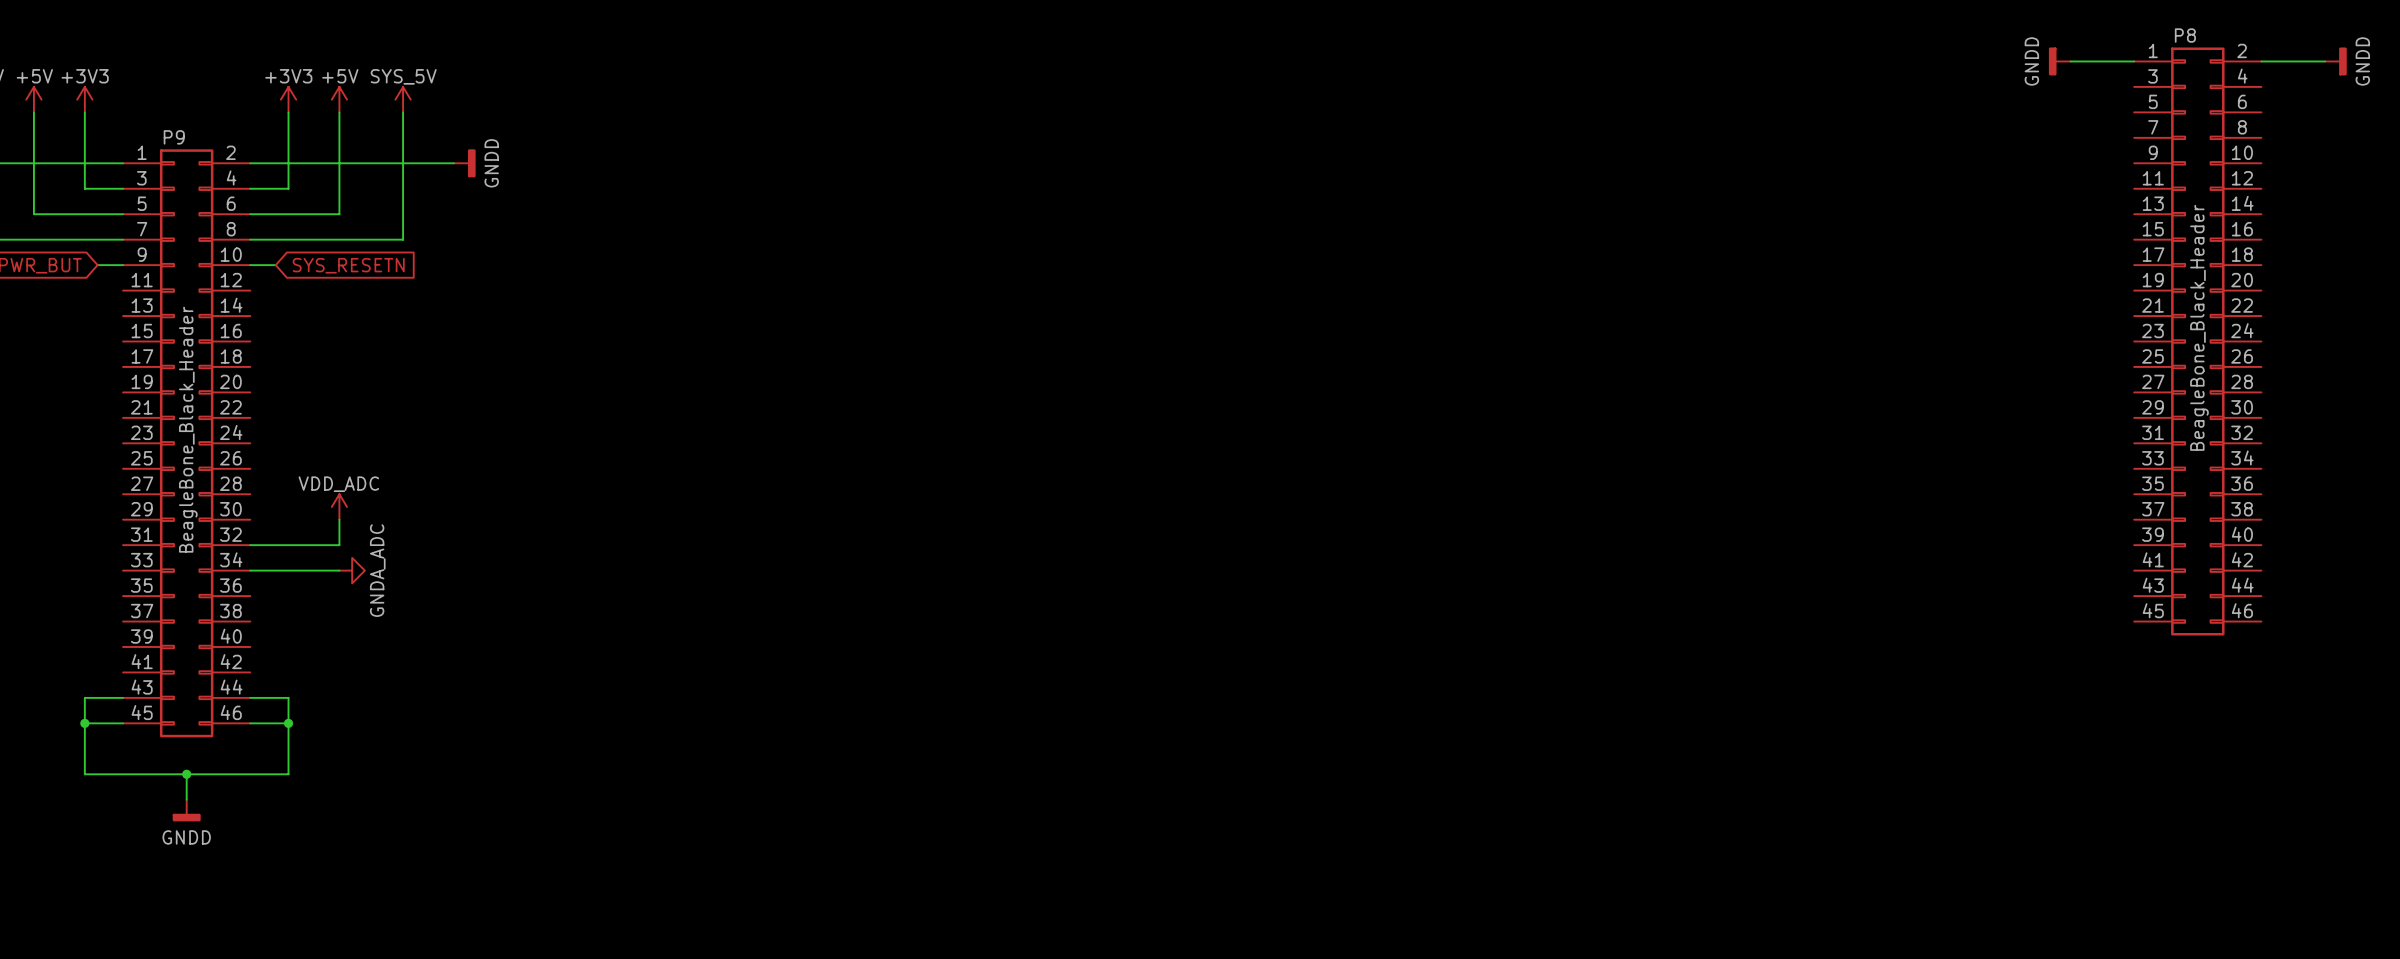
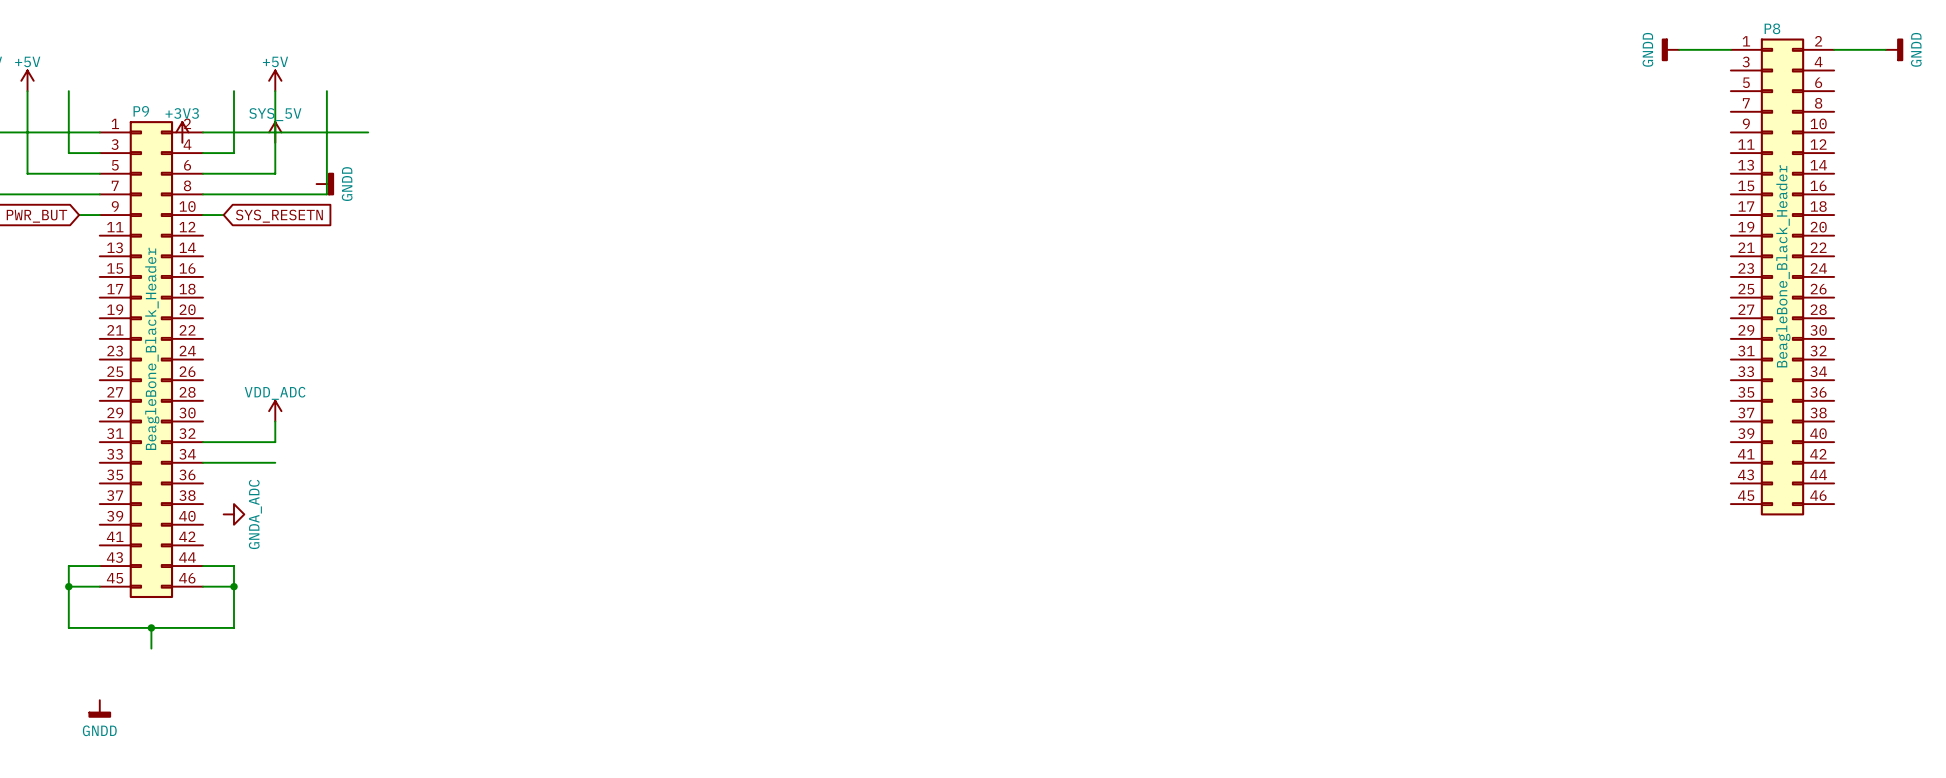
power symbol: +3V3 (84, 99) -> none
power symbol: +3V3 (288, 99) -> none
power symbol position: SYS_5V (403, 99) -> SYS_5V (275, 132)
power symbol: none -> +3V3 (182, 132)
power symbol position: GNDD (464, 163) -> GNDD (325, 184)
power symbol position: GNDA_ADC (352, 570) -> GNDA_ADC (233, 514)
power symbol position: GNDD (186, 810) -> GNDD (99, 709)

